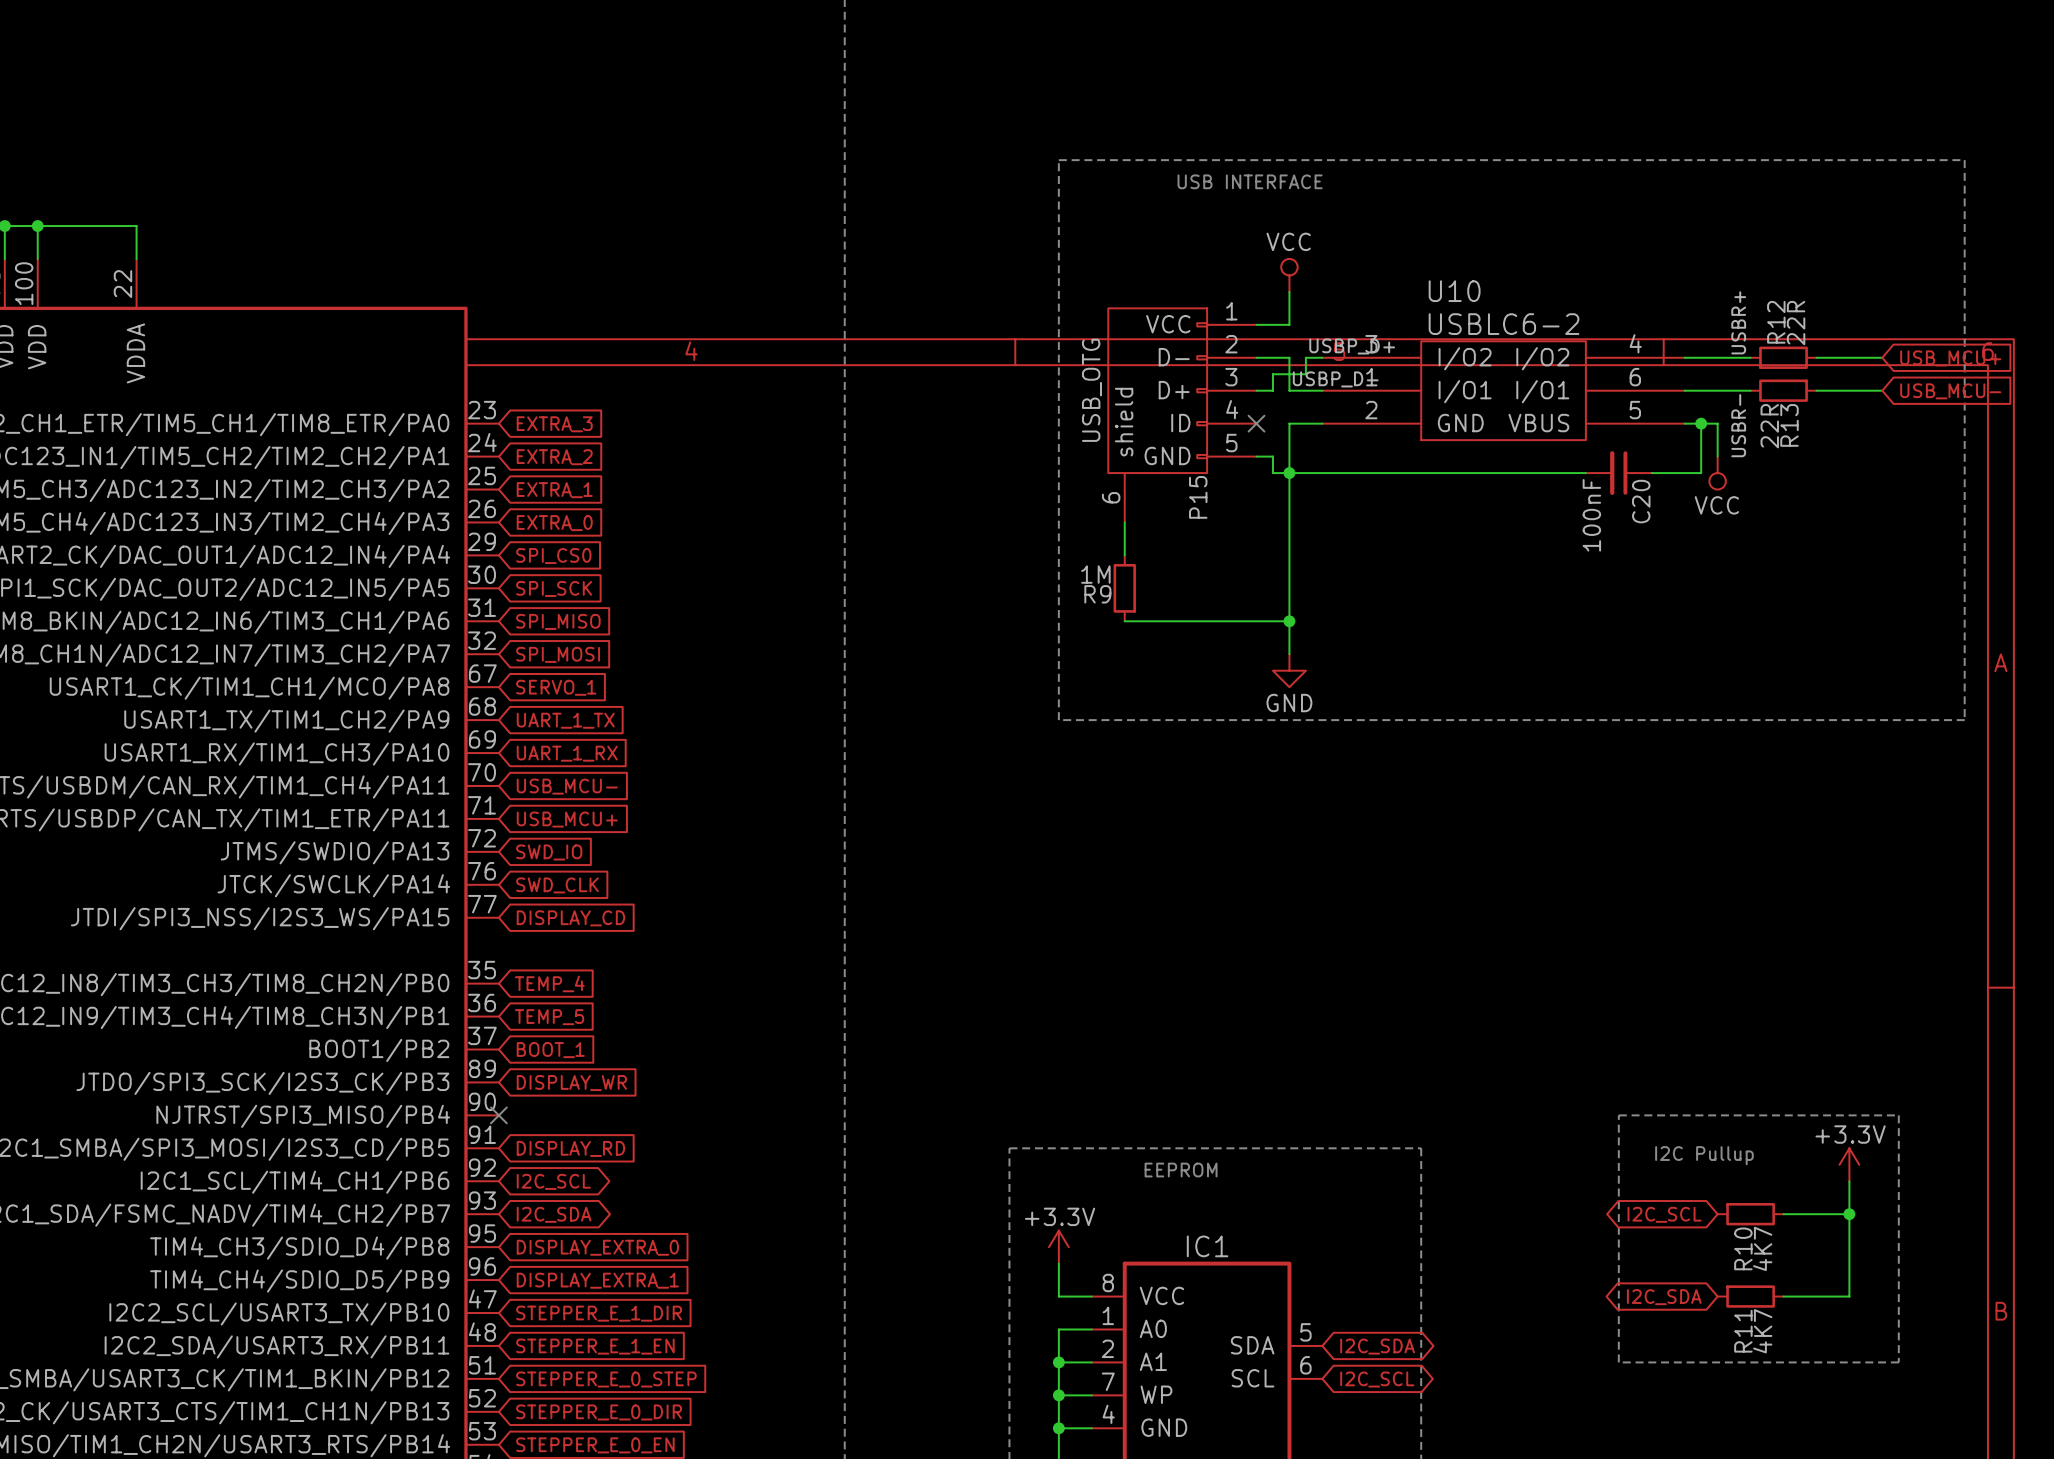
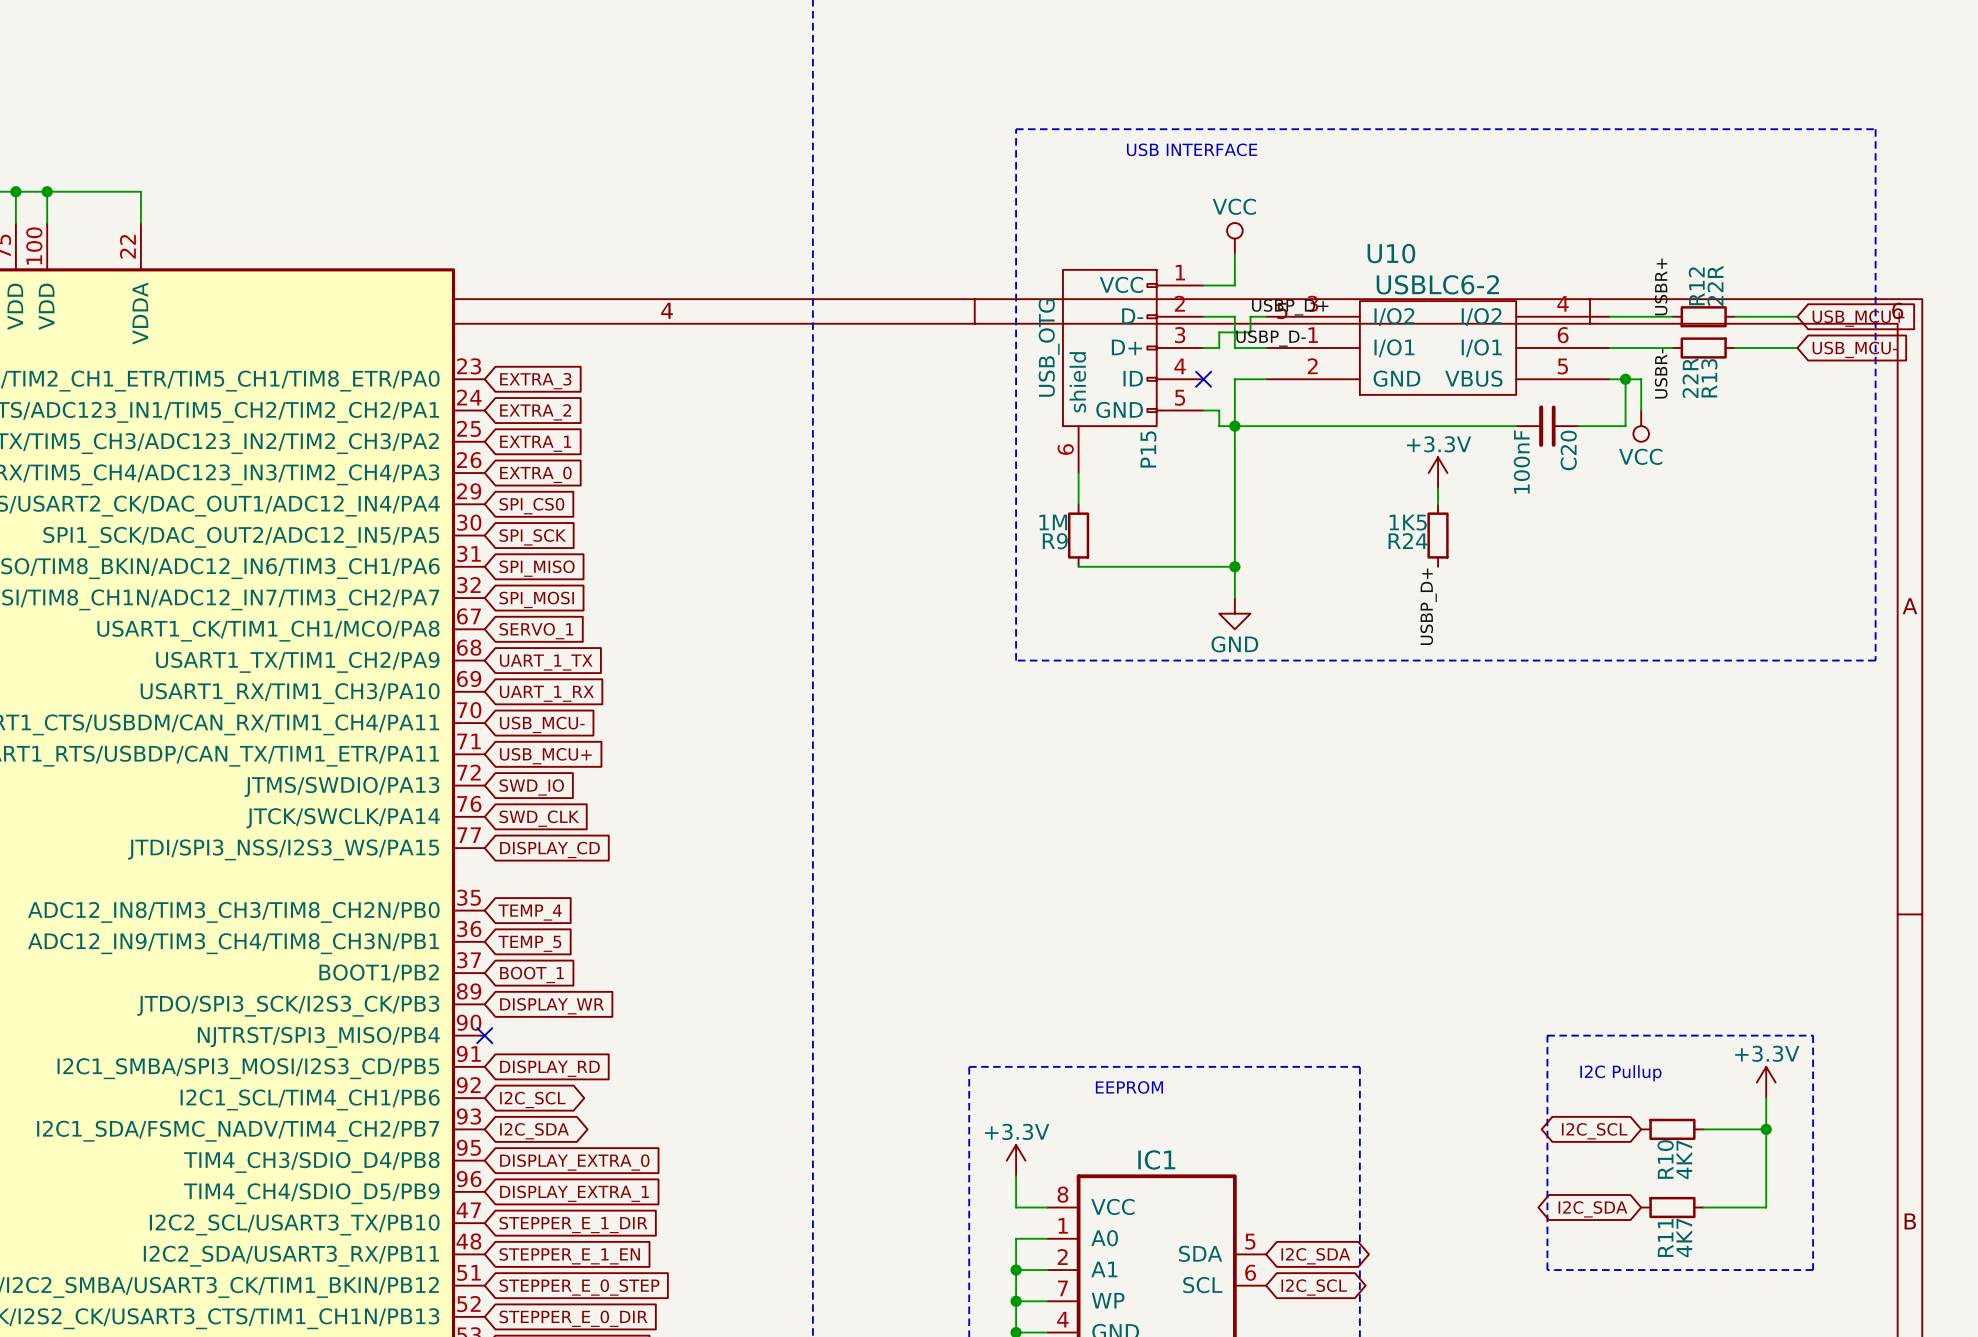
power symbol: none -> +3.3V (1438, 473)
wire: none -> (1438, 488) (1438, 504)
R24: none -> 1K5 (1438, 535)
label: none -> USBP_D+ (1428, 606)

